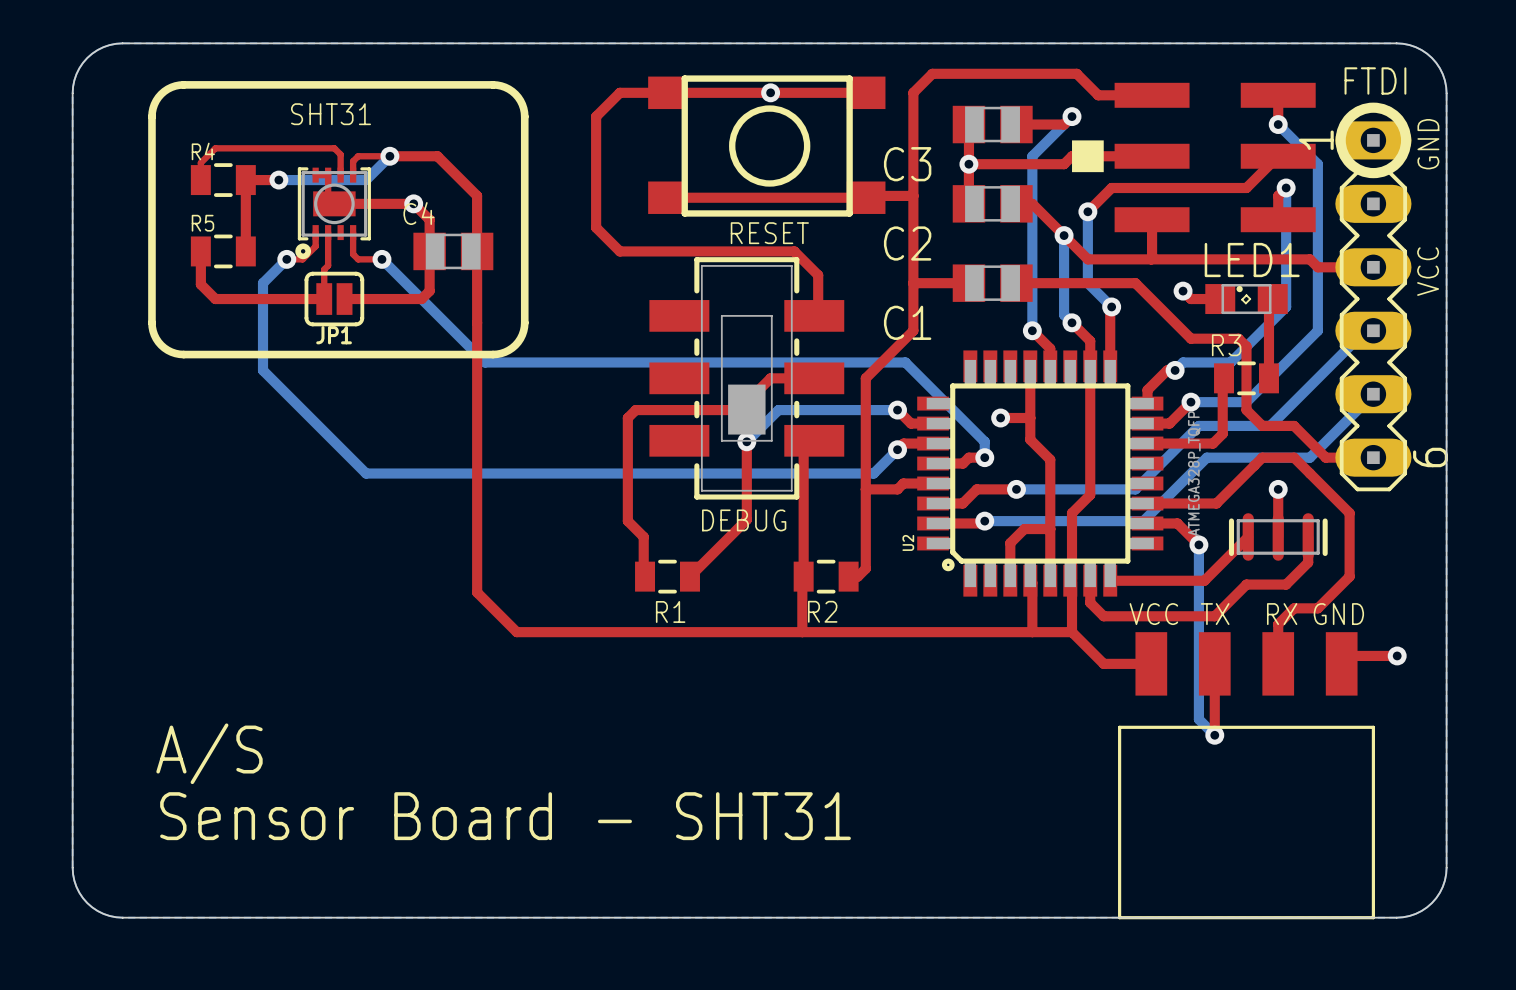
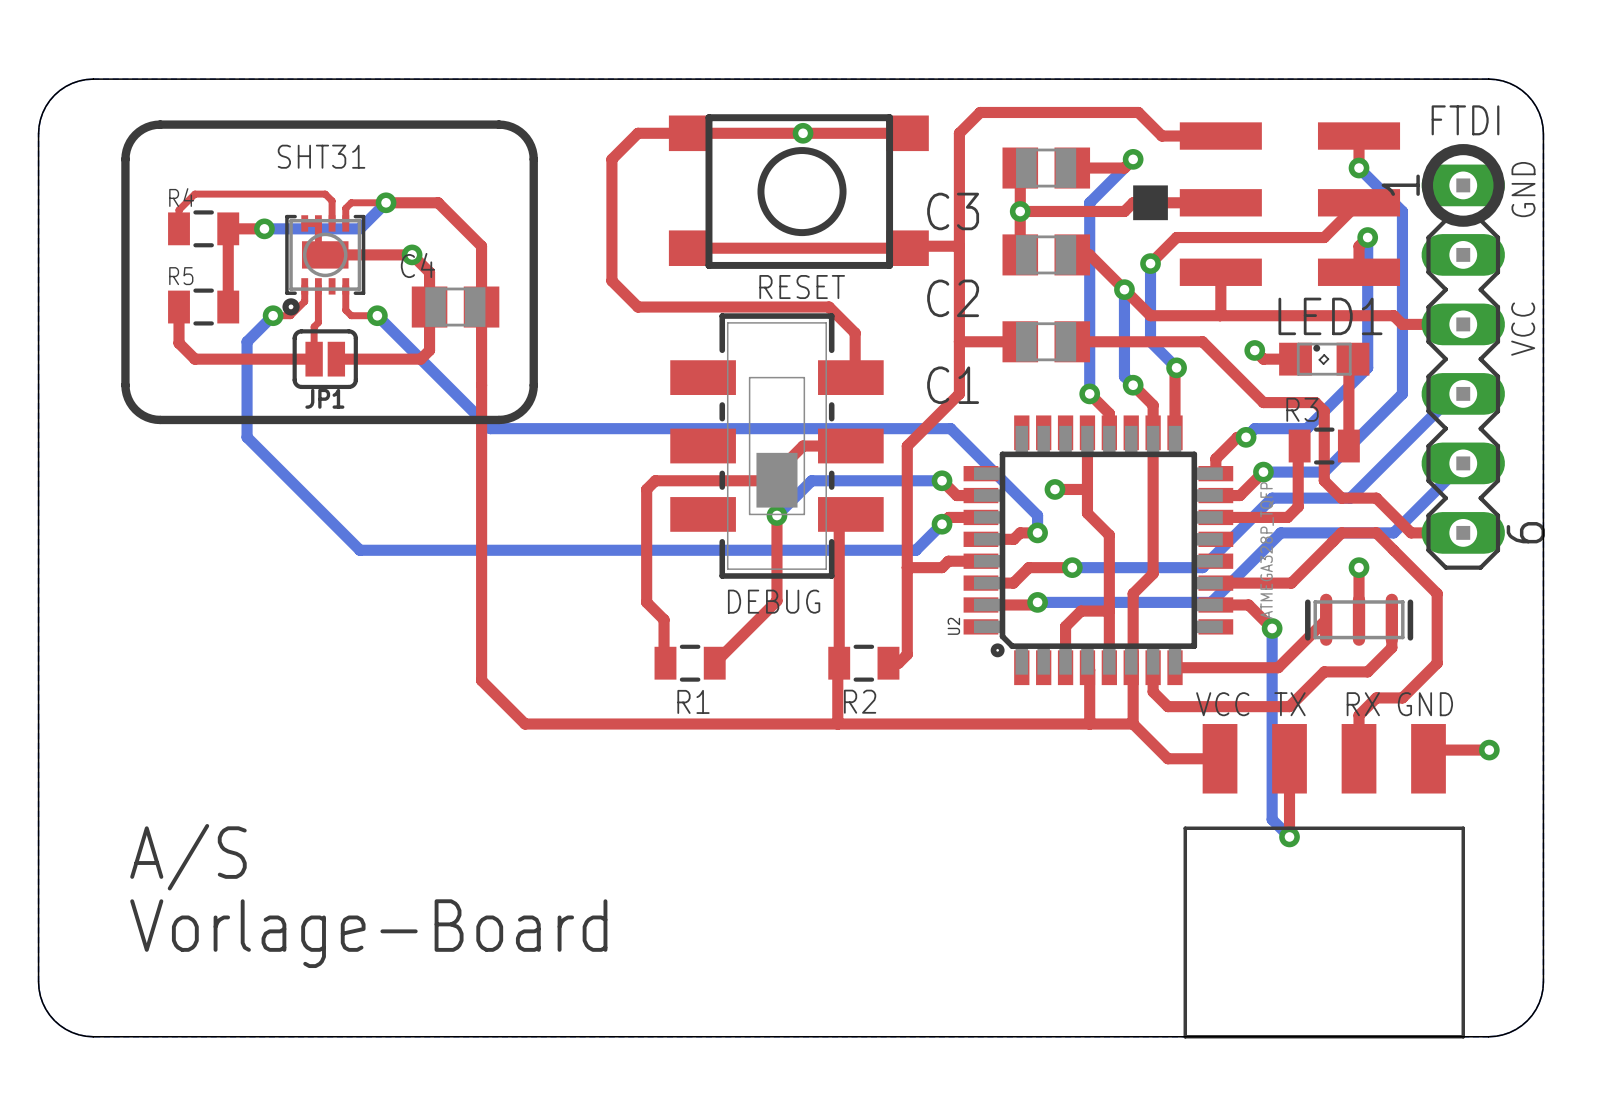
text: Sensor Board - SHT31 (505, 816) -> Vorlage-Board (368, 933)

